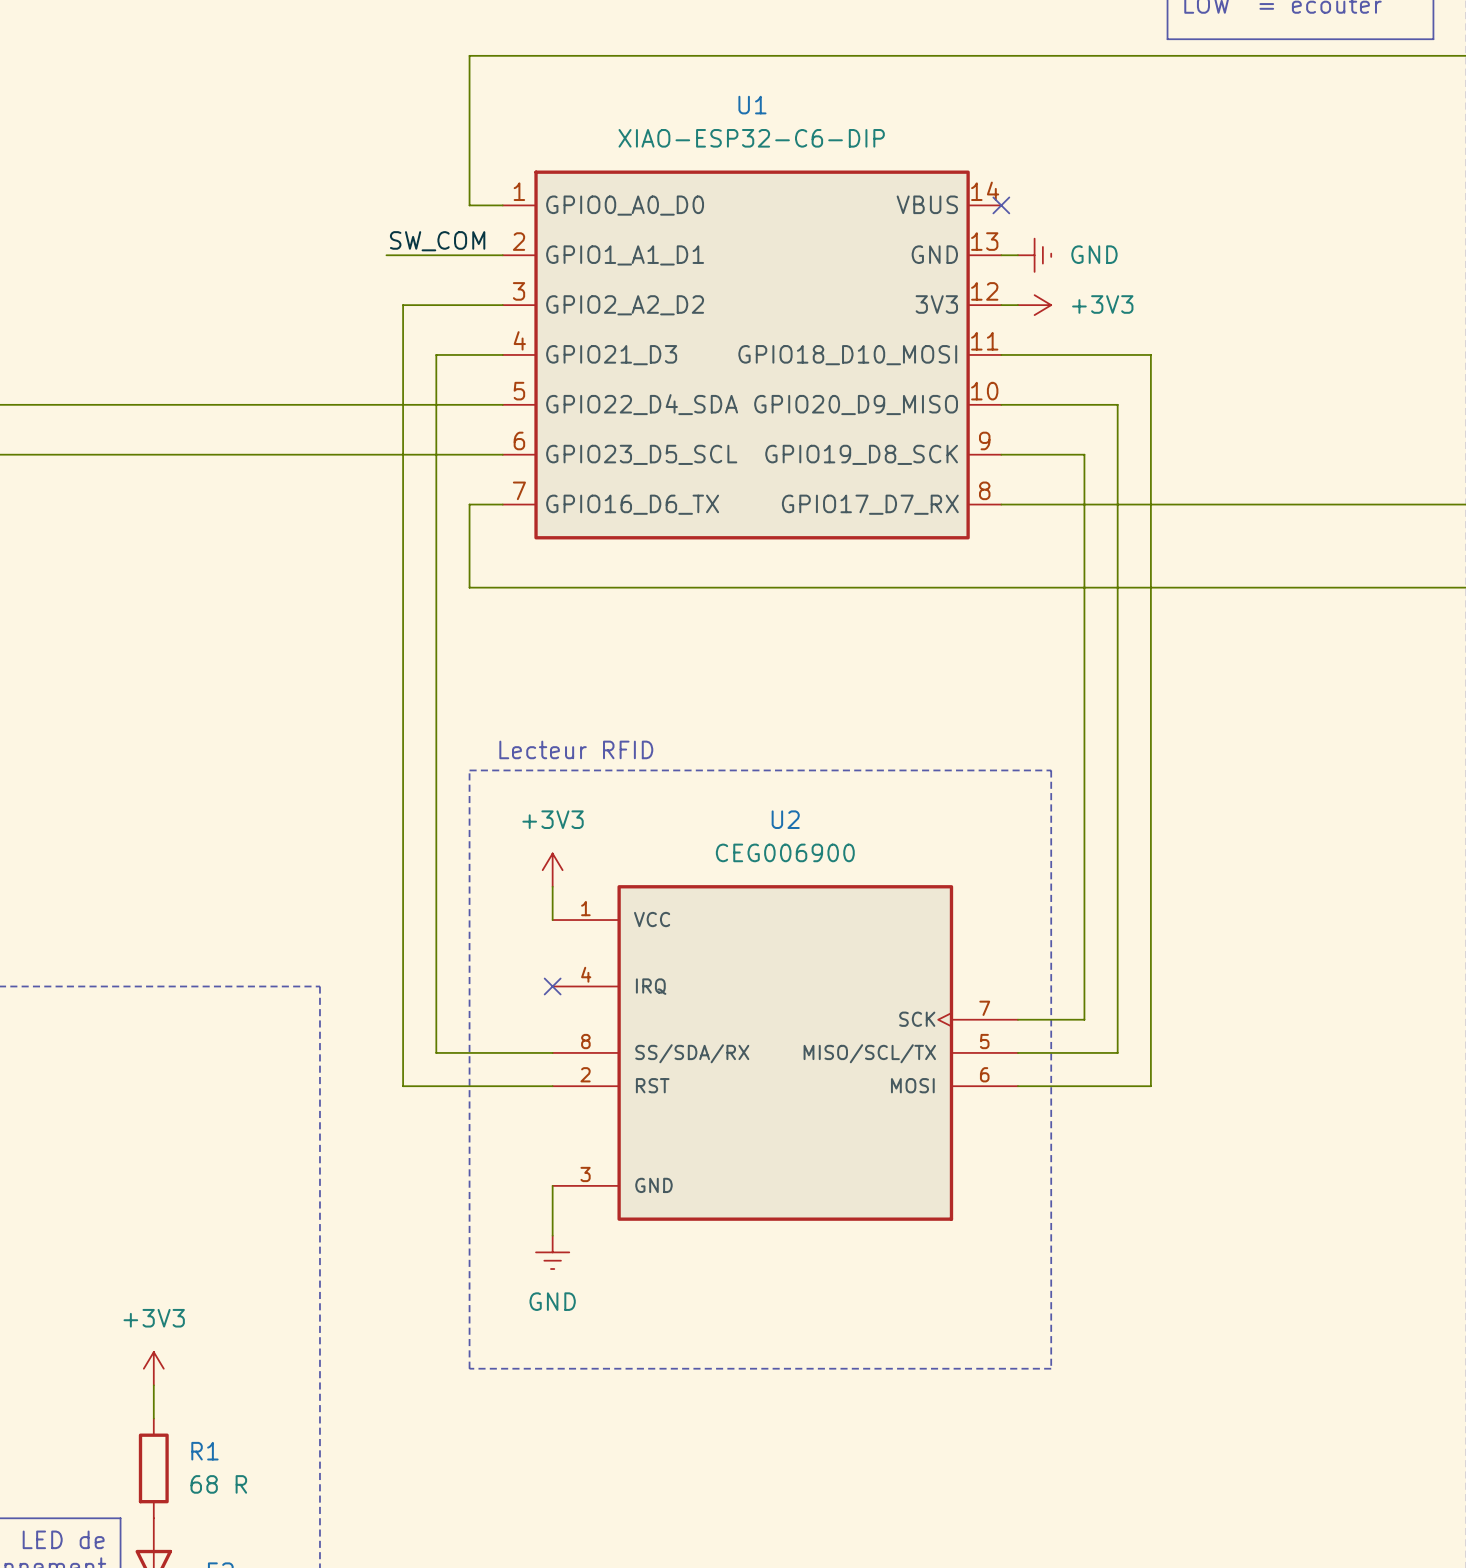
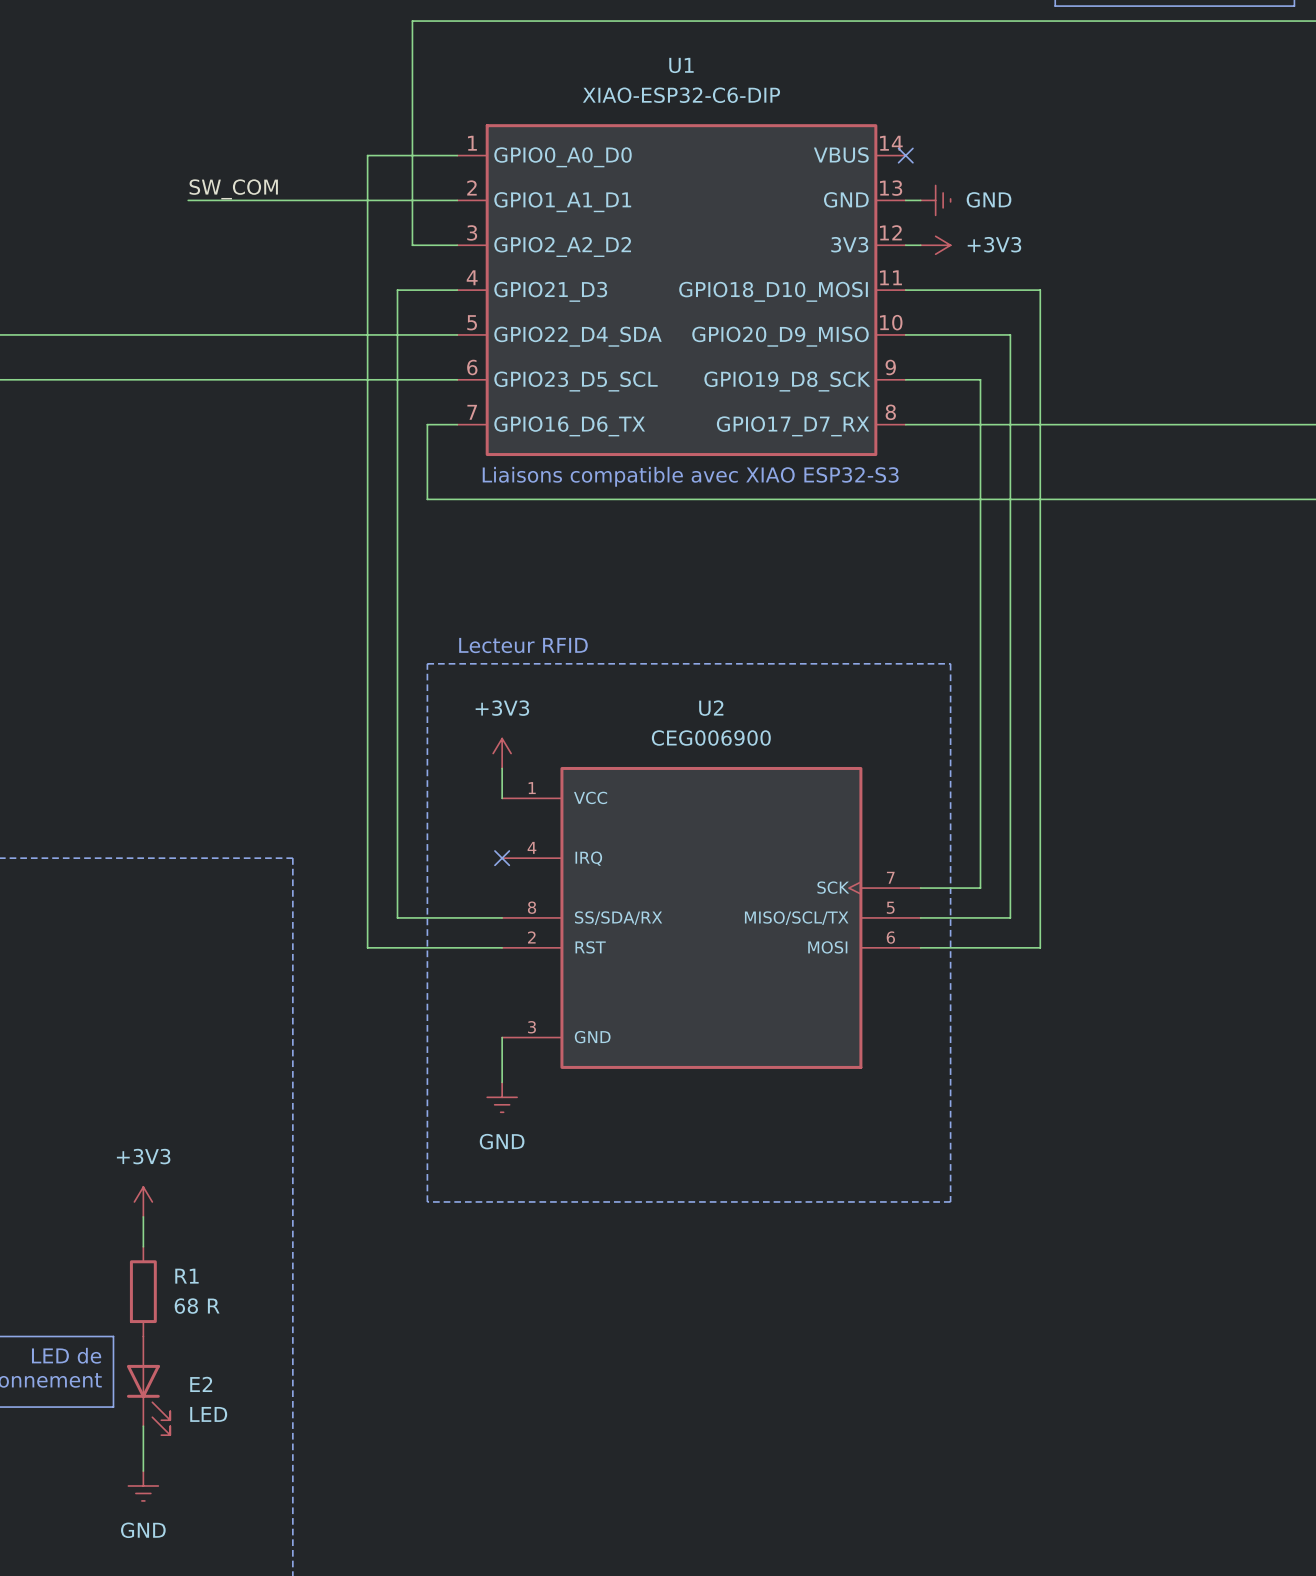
wire: (469, 55) (469, 205) -> (427, 21) (412, 21) (412, 245)
label position: SW_COM (437, 241) -> SW_COM (233, 189)
wire: none -> (188, 200) (352, 200)
wire: (403, 305) (452, 305) -> (367, 245) (367, 155) (427, 155)
text: none -> Liaisons compatible avec XIAO ESP32-S3 (690, 476)

